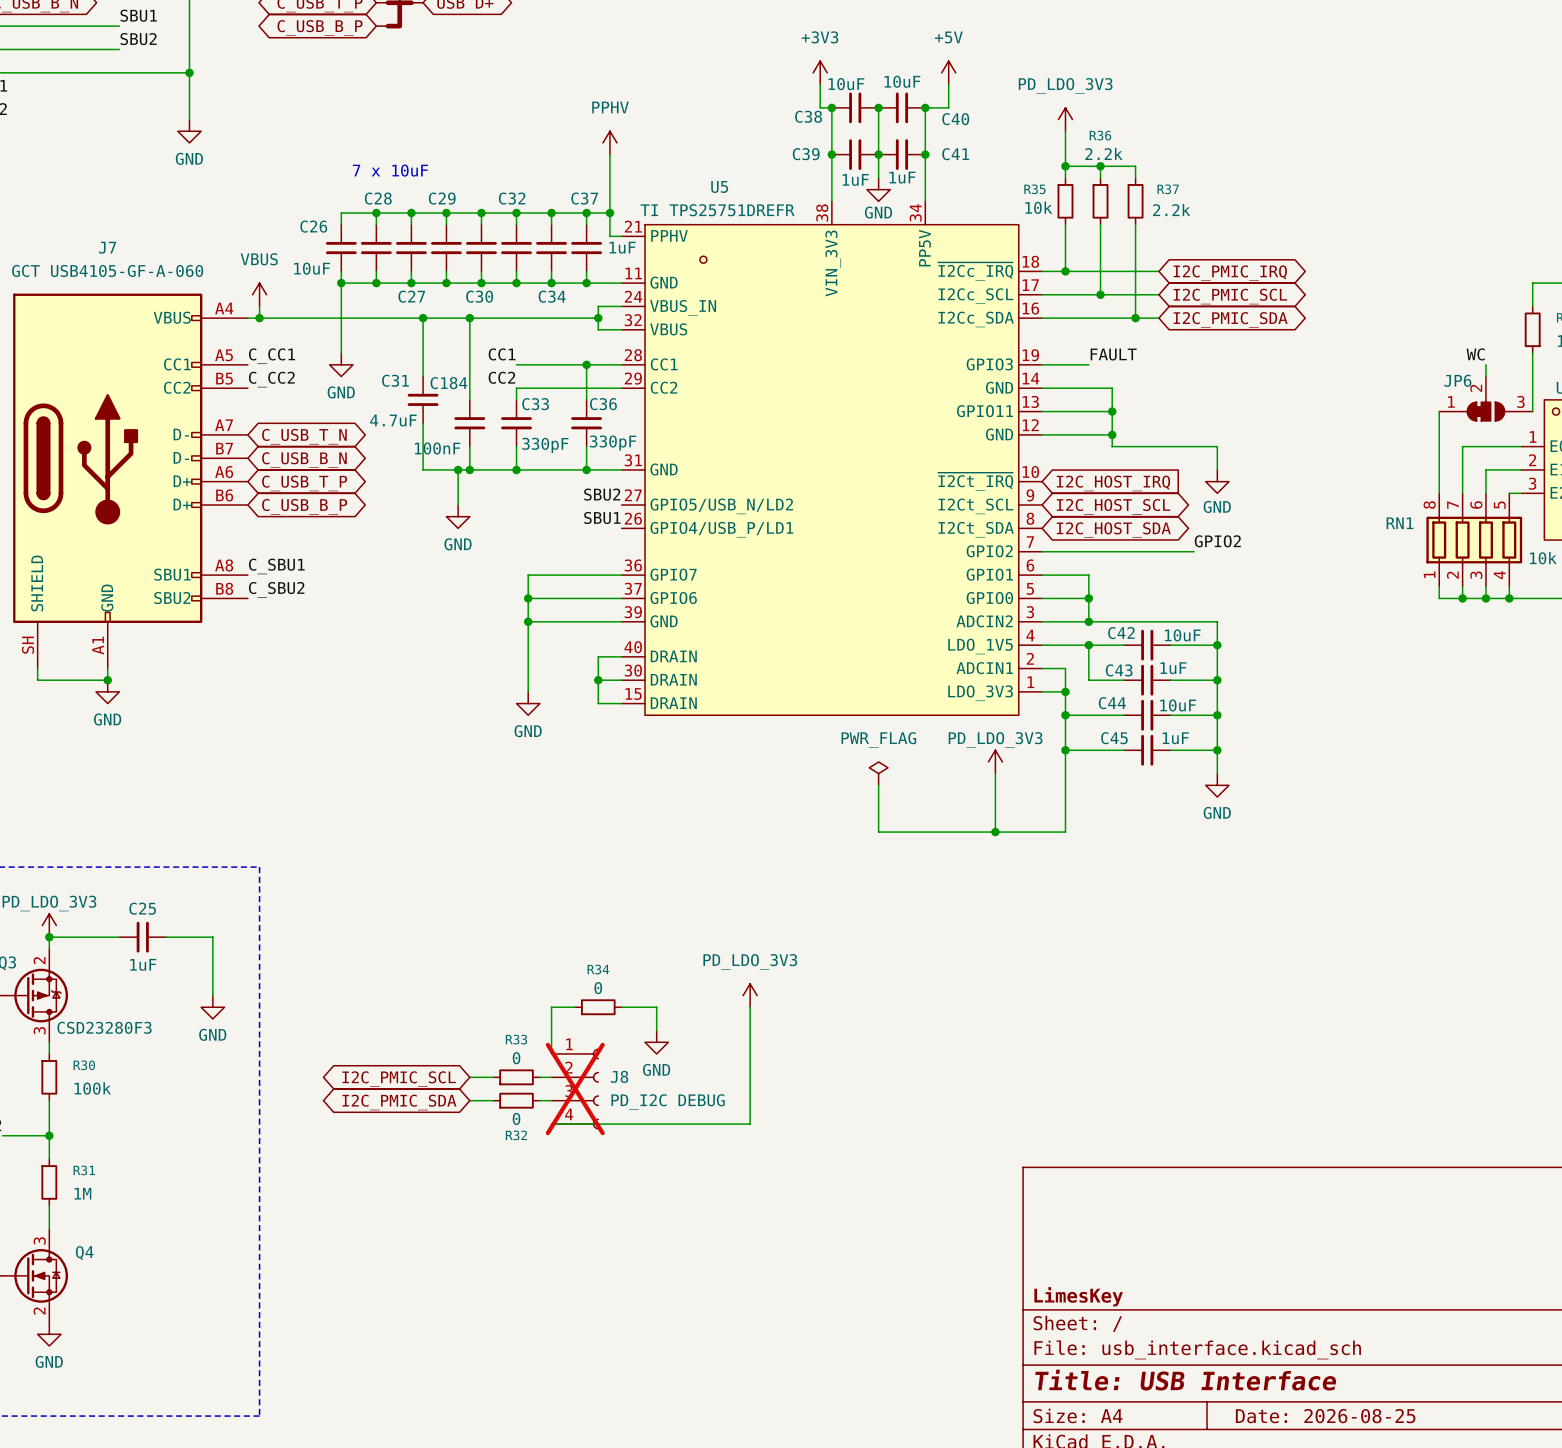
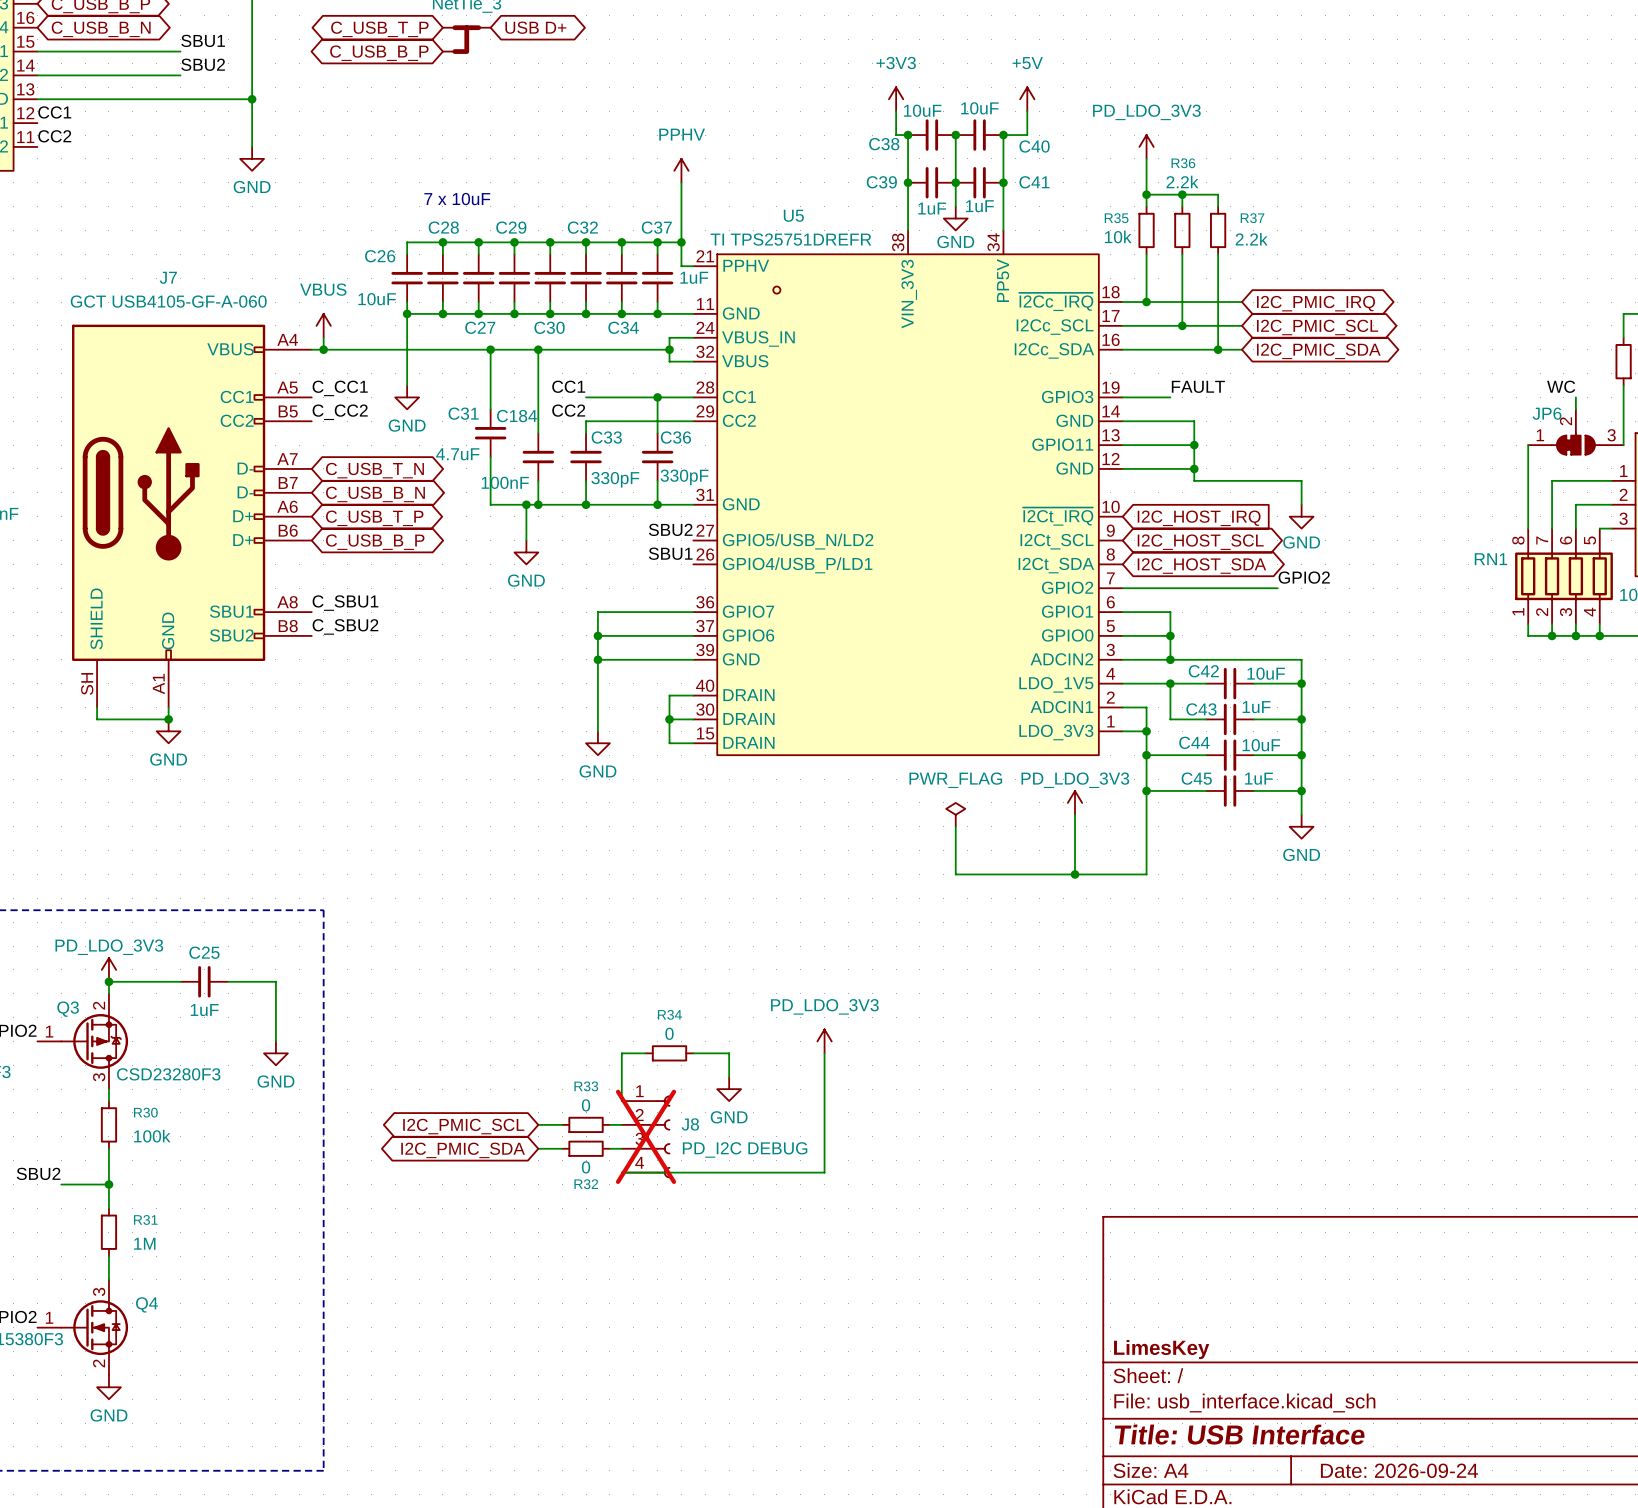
title block: Date: 2026-08-25 (1325, 1416) -> Date: 2026-09-24 (1399, 1470)

